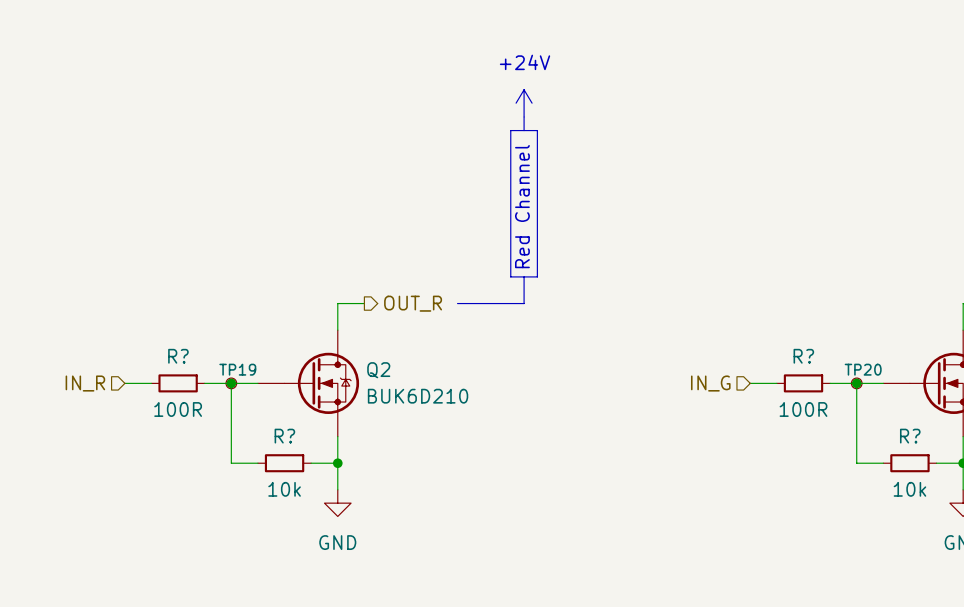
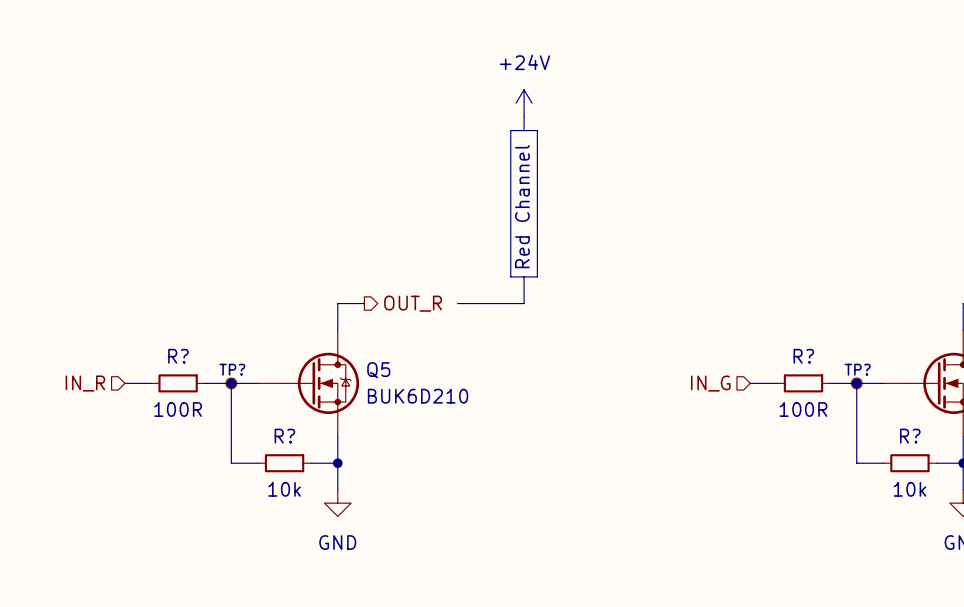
TP19 name: TP19 (237, 369) -> TP? (232, 369)
TP20 name: TP20 (863, 369) -> TP? (857, 369)
Q2 name: Q2 (378, 370) -> Q5 (378, 370)

